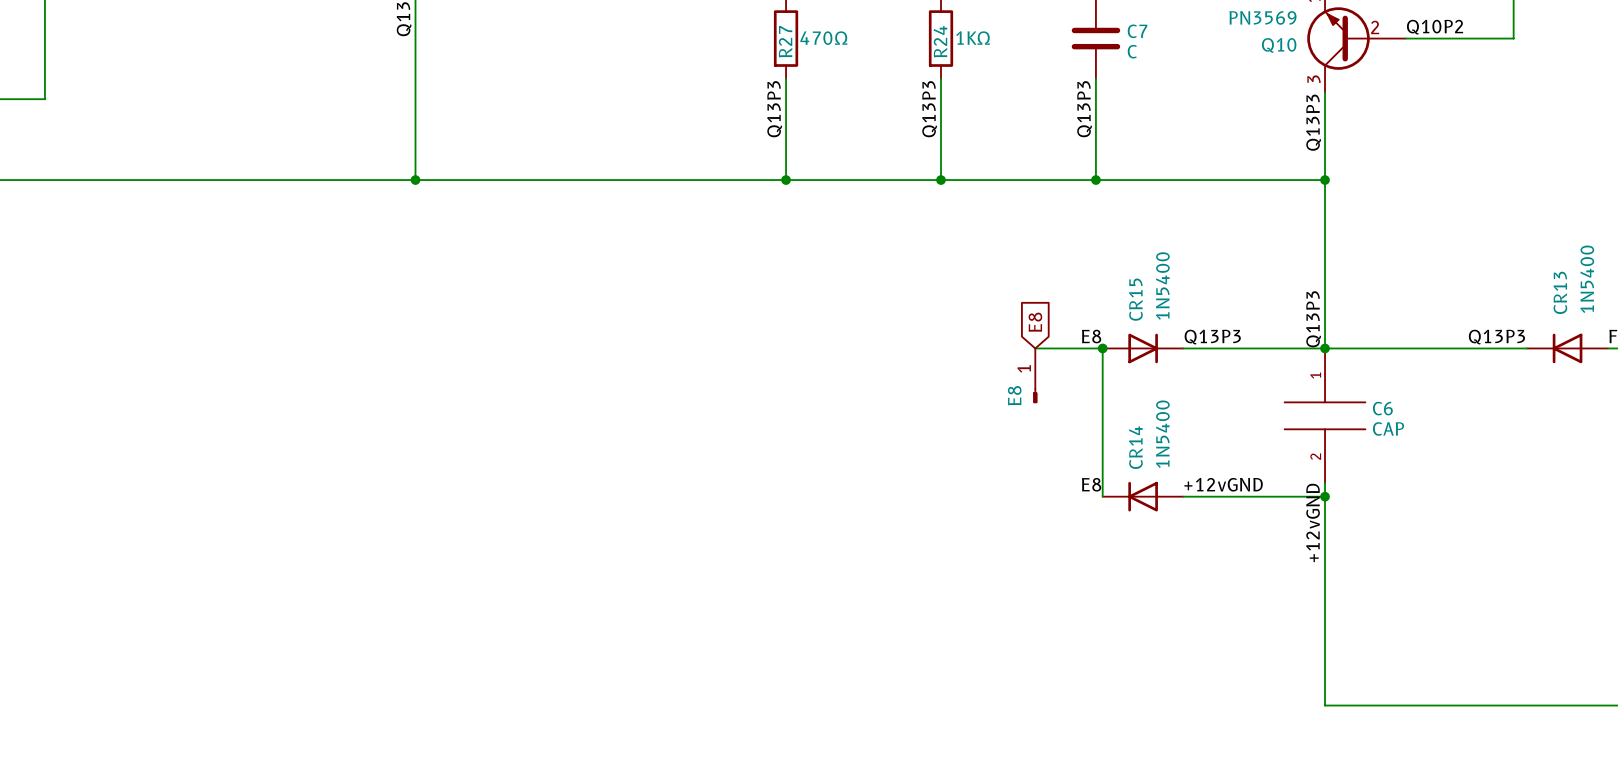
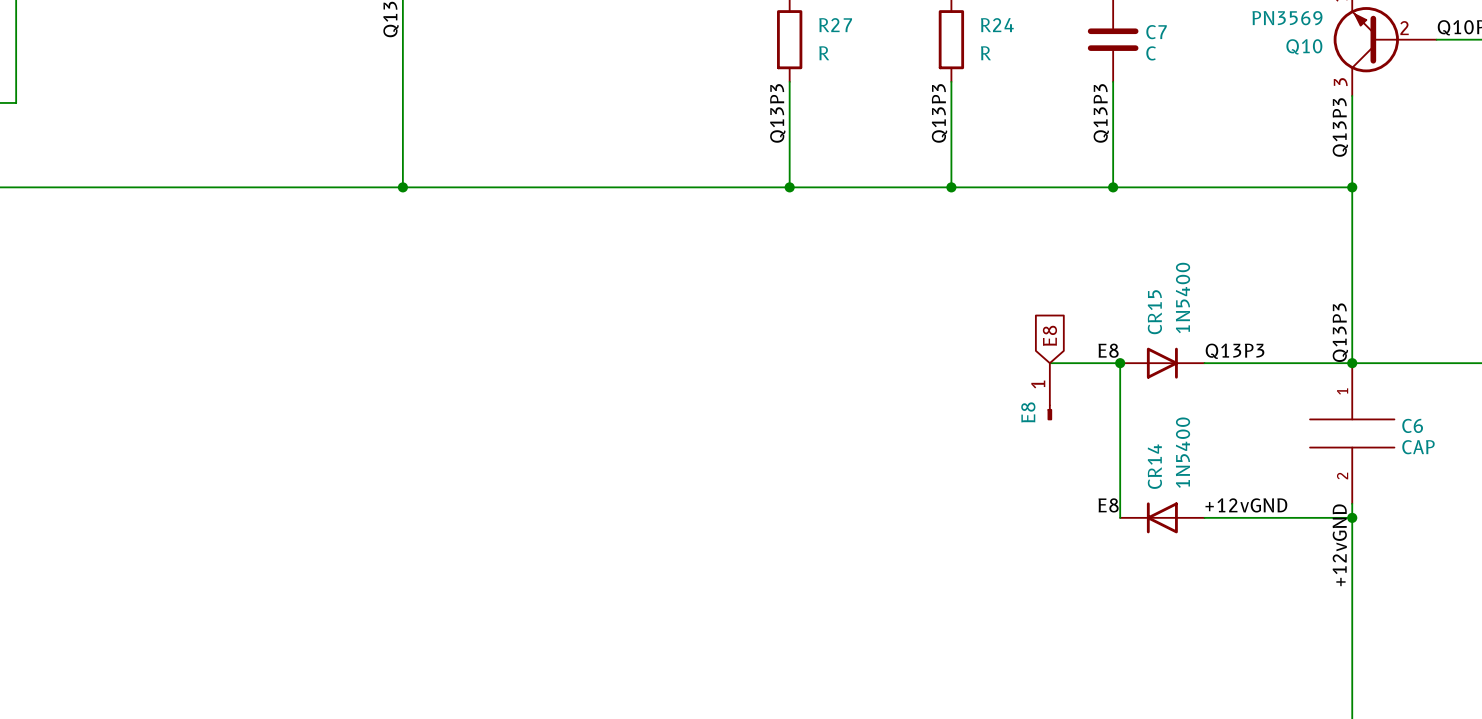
R27 value: 470Ω (823, 38) -> R (824, 53)
R24 value: 1KΩ (973, 38) -> R (985, 53)
R27 name rotation: 0° (785, 41) -> 90° clockwise (835, 25)
R27 name position: R27 (785, 41) -> R27 (835, 25)
R24 name rotation: 0° (940, 41) -> 90° clockwise (997, 25)
R24 name position: R24 (940, 41) -> R24 (997, 25)

